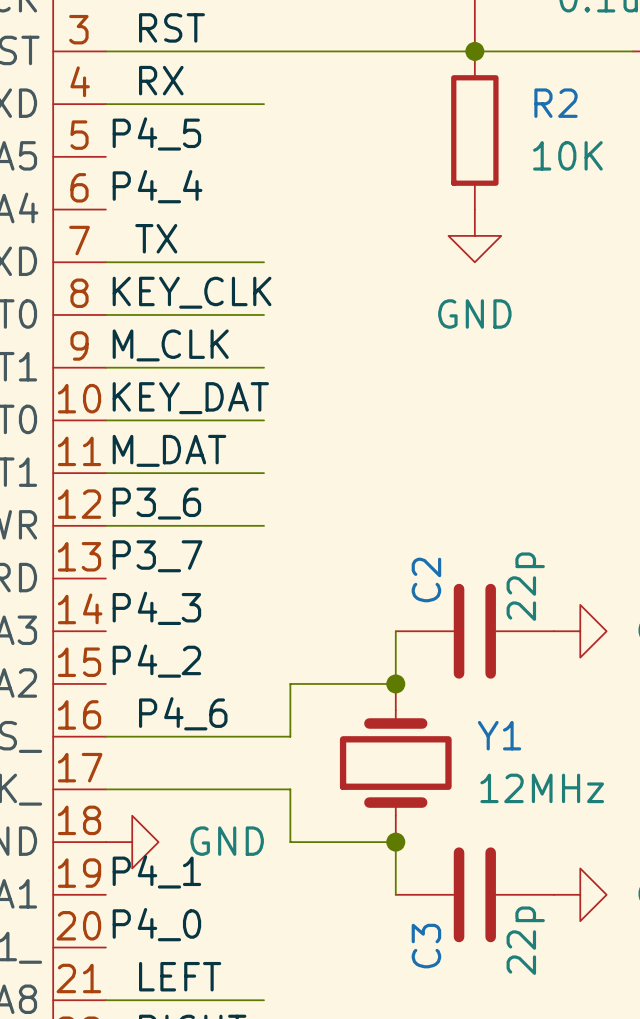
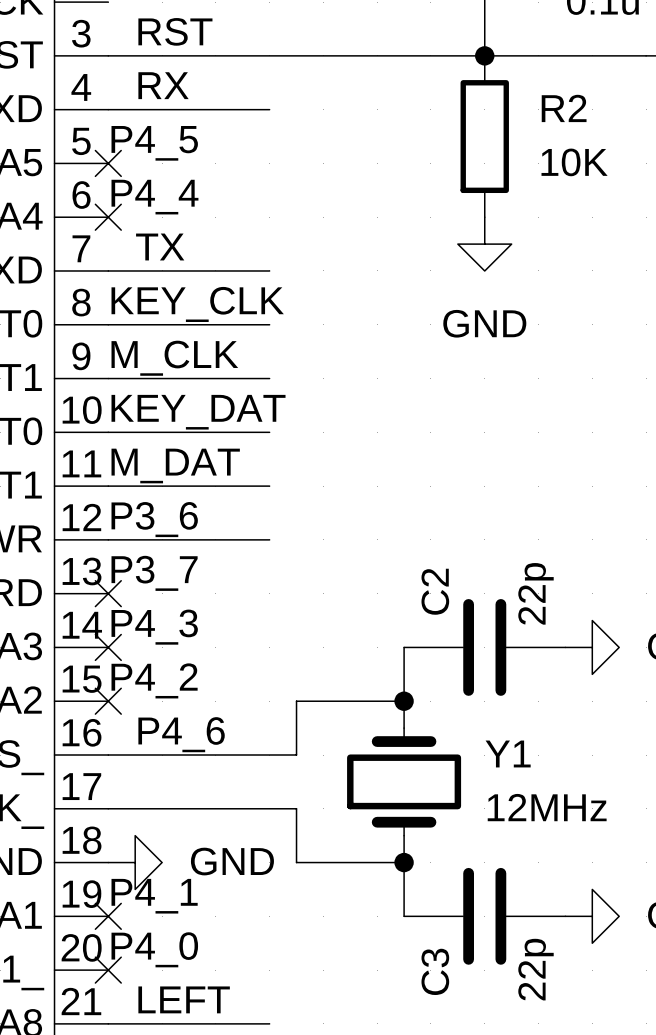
no-connect mark: none -> (108, 163)
no-connect mark: none -> (108, 217)
no-connect mark: none -> (108, 593)
no-connect mark: none -> (108, 647)
no-connect mark: none -> (108, 701)
no-connect mark: none -> (108, 916)
no-connect mark: none -> (108, 970)

